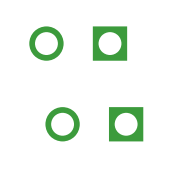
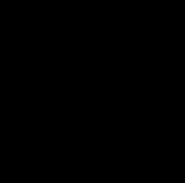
part: (78, 43) -> none
part: (94, 124) -> none

